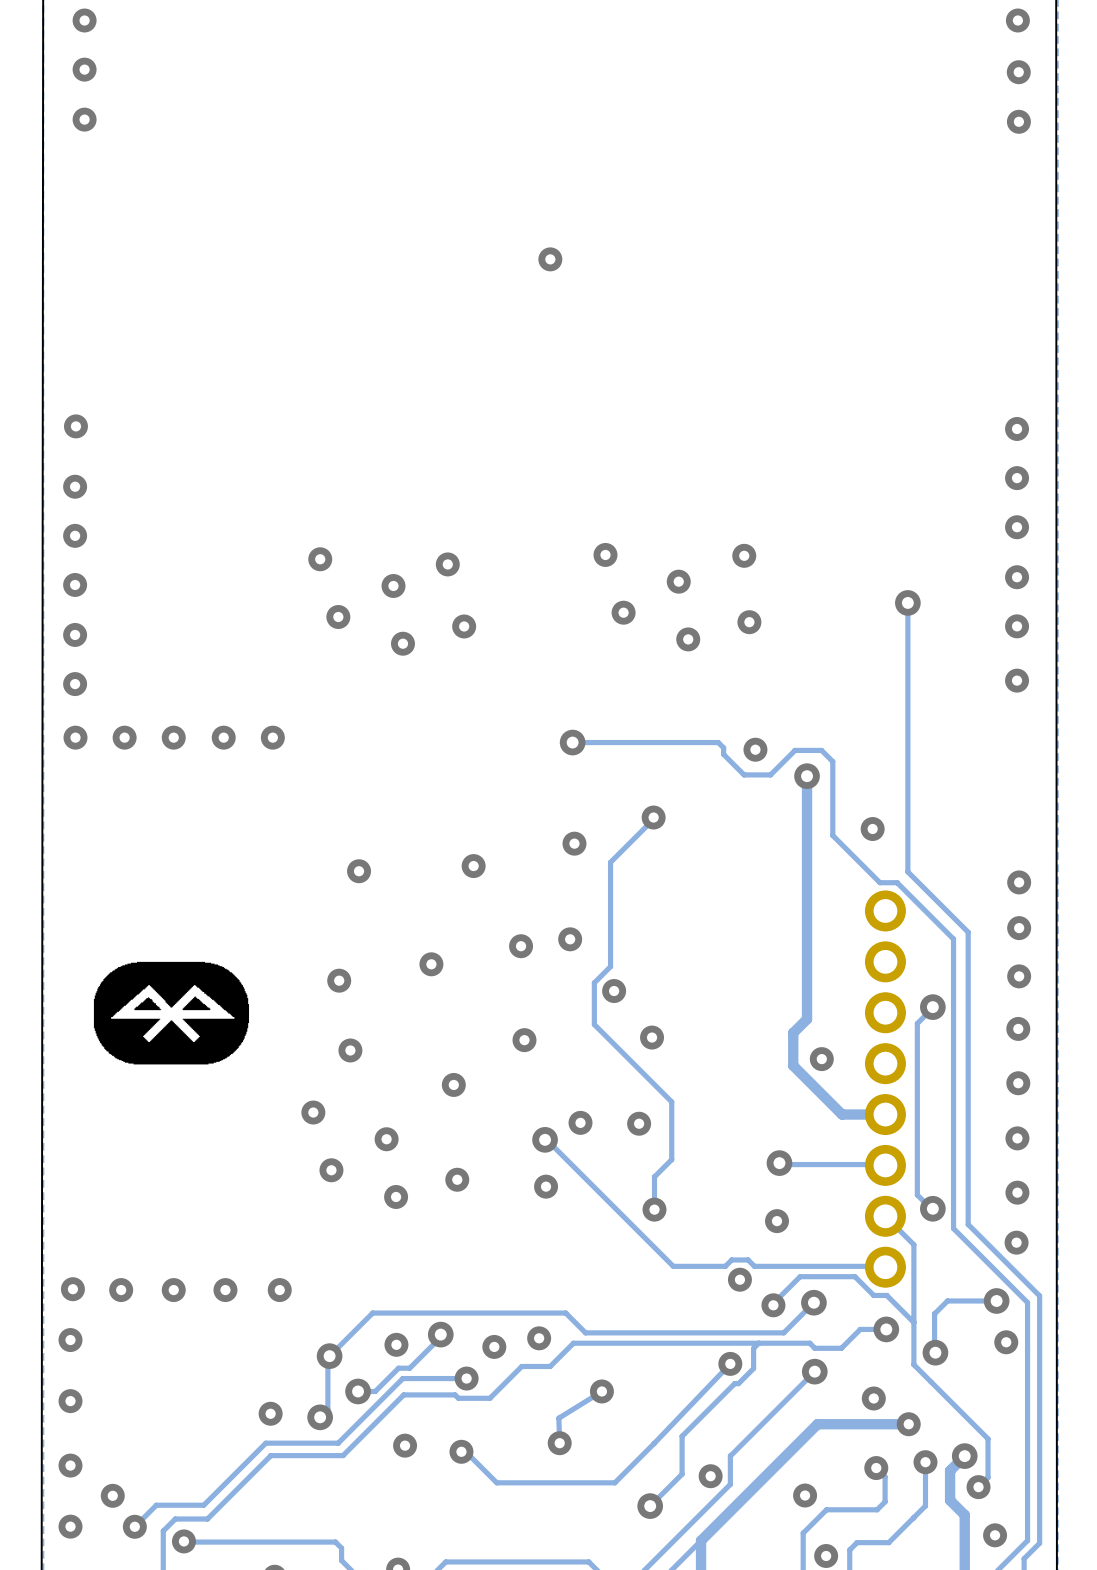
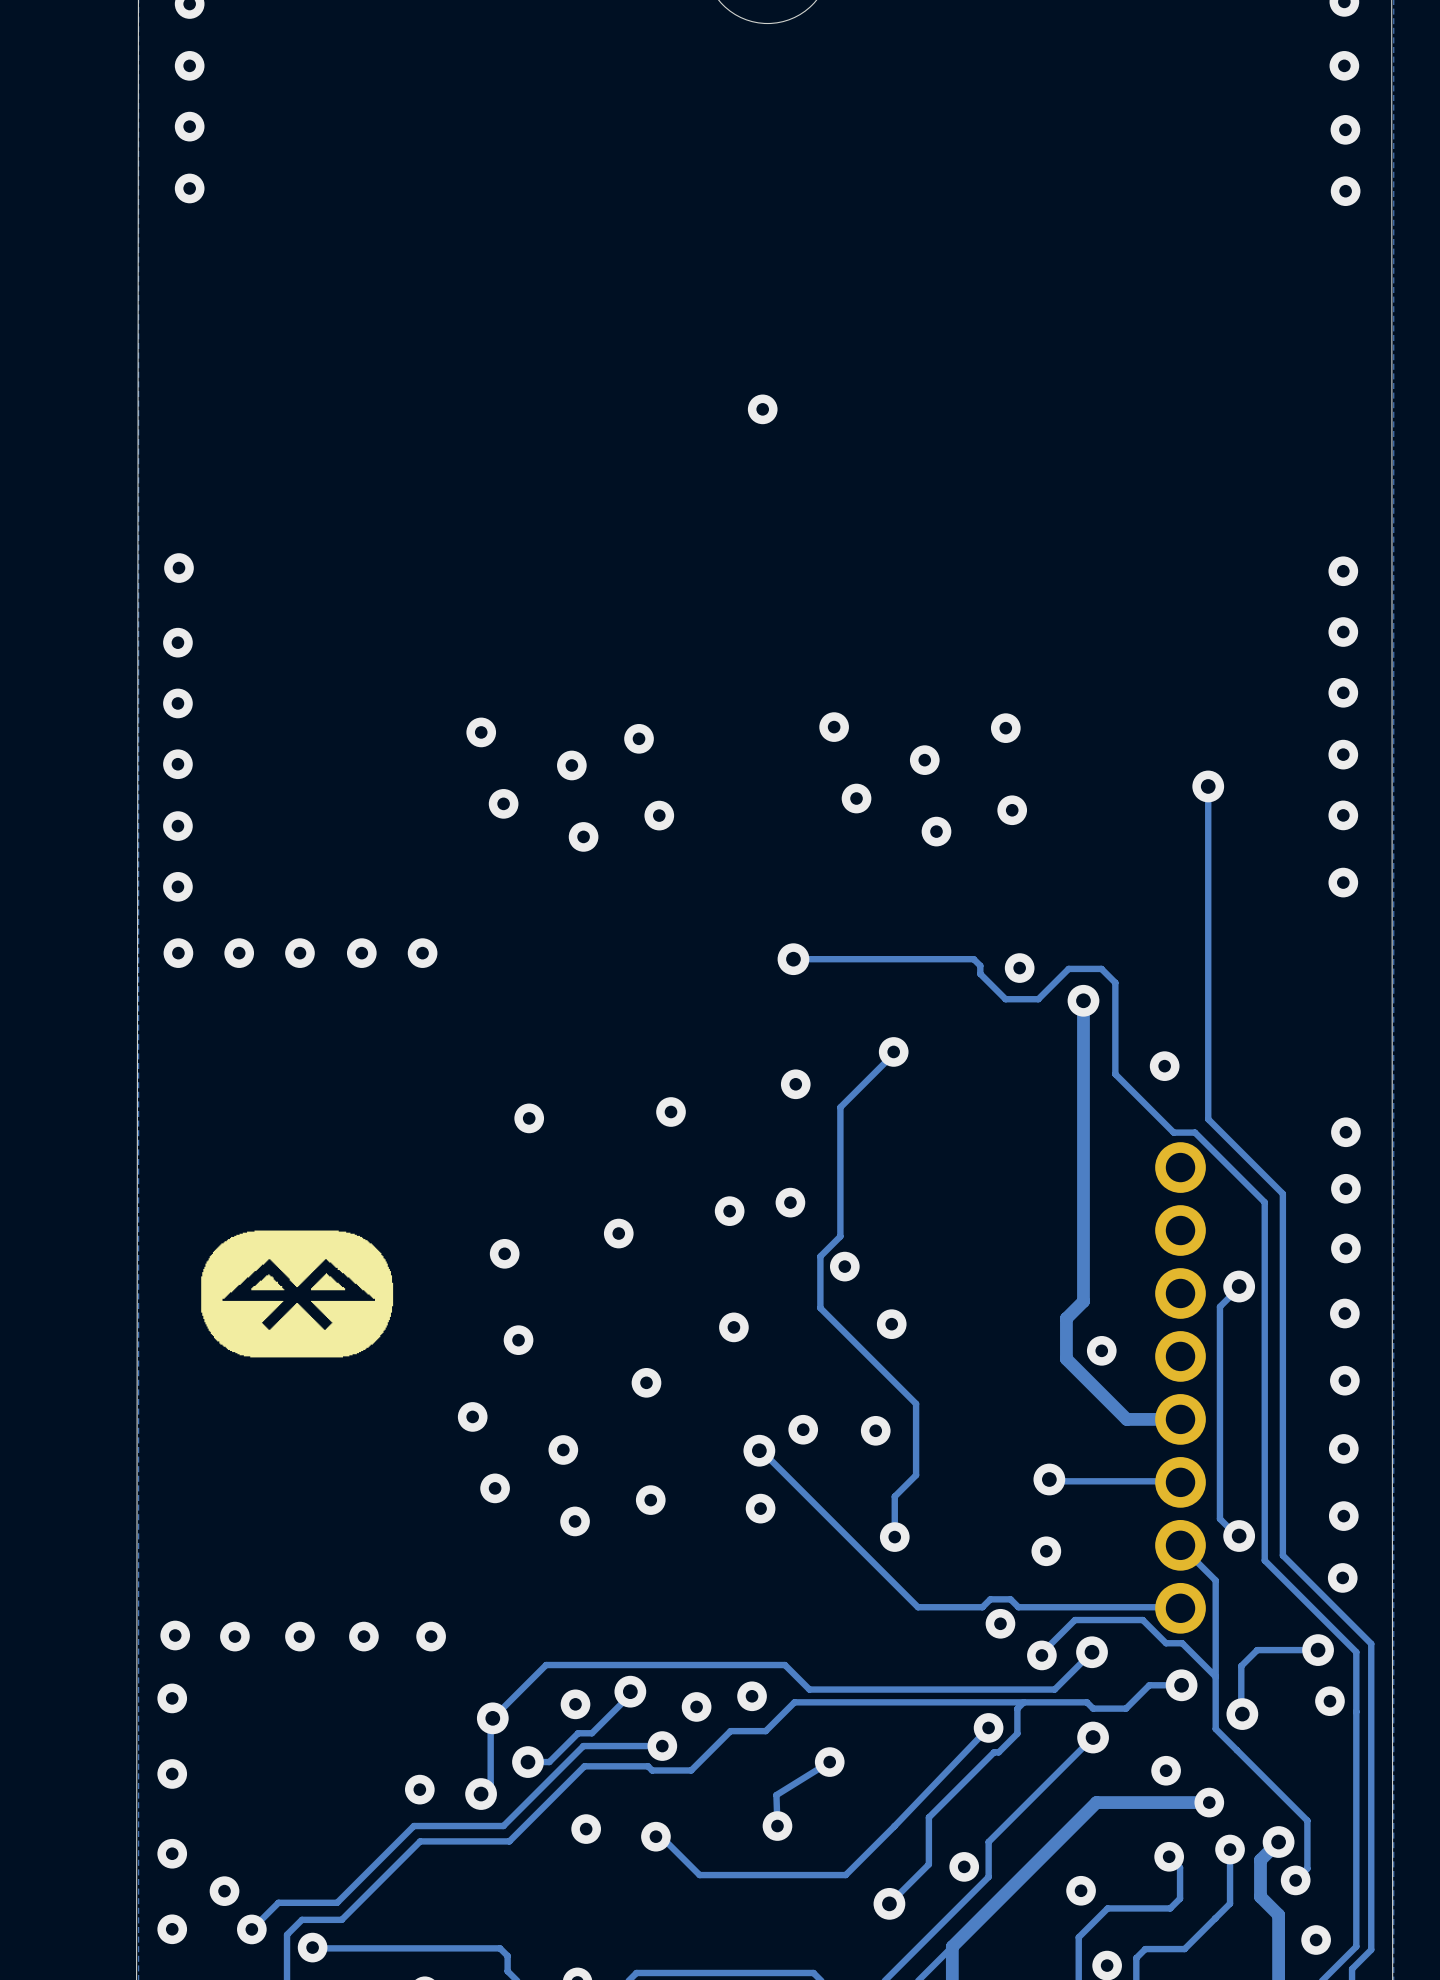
via position: (550, 259) -> (762, 409)

